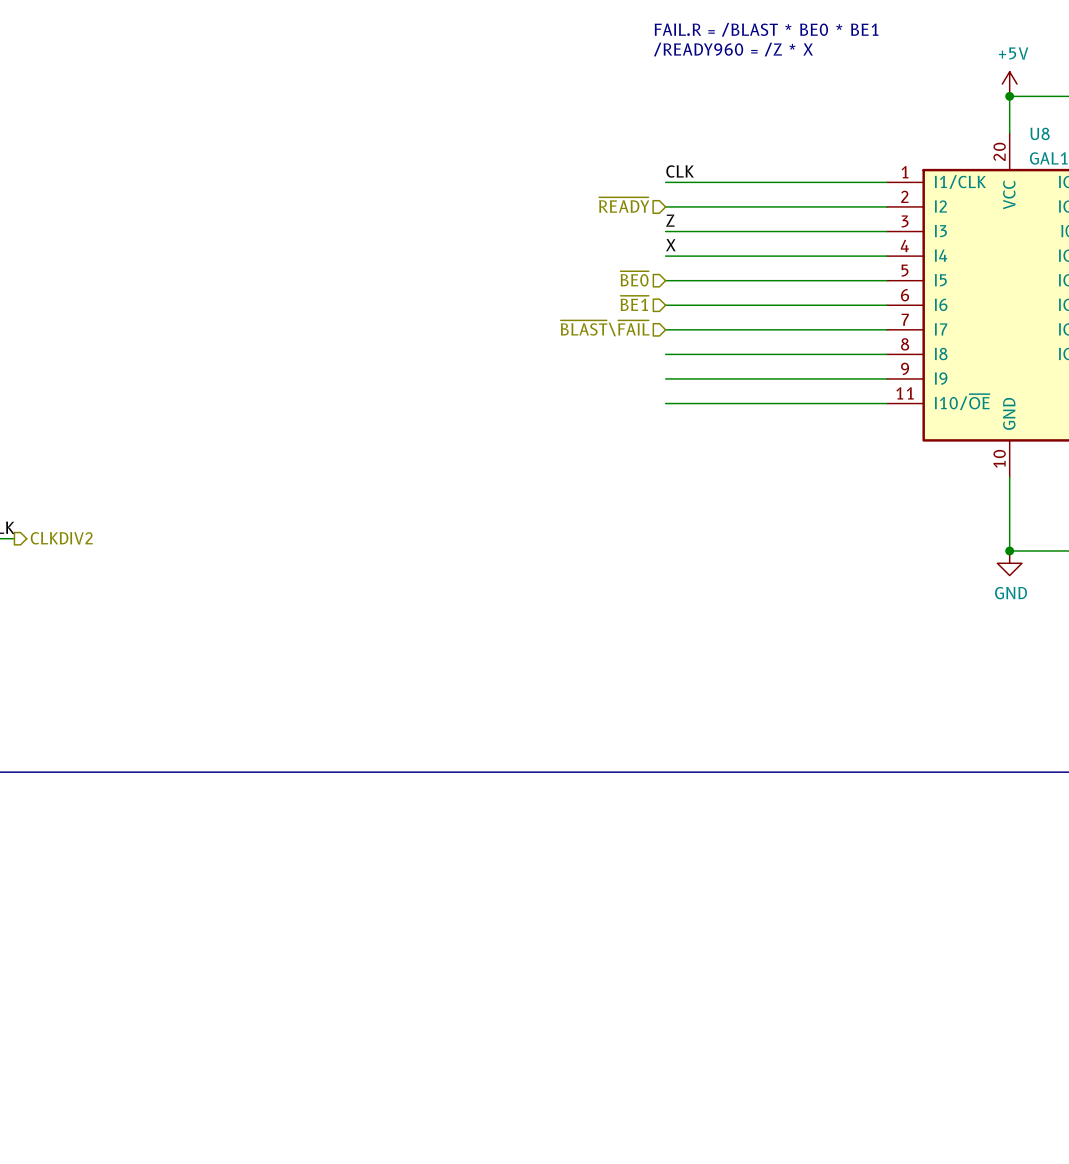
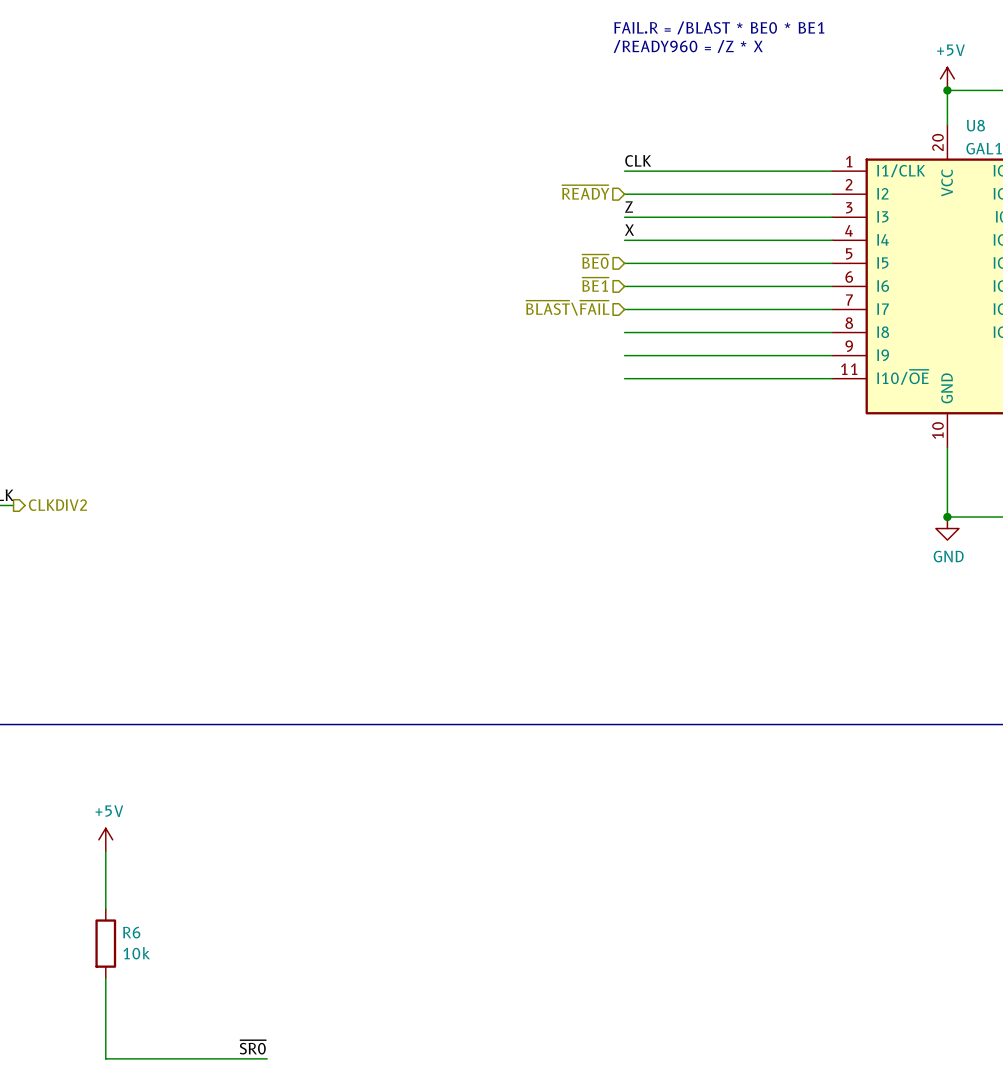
power symbol: none -> +5V (105, 839)
wire: none -> (105, 851) (105, 909)
R6: none -> 10k (105, 943)
wire: none -> (105, 978) (105, 1058) (267, 1058)
label: none -> ~{SR0} (252, 1047)

